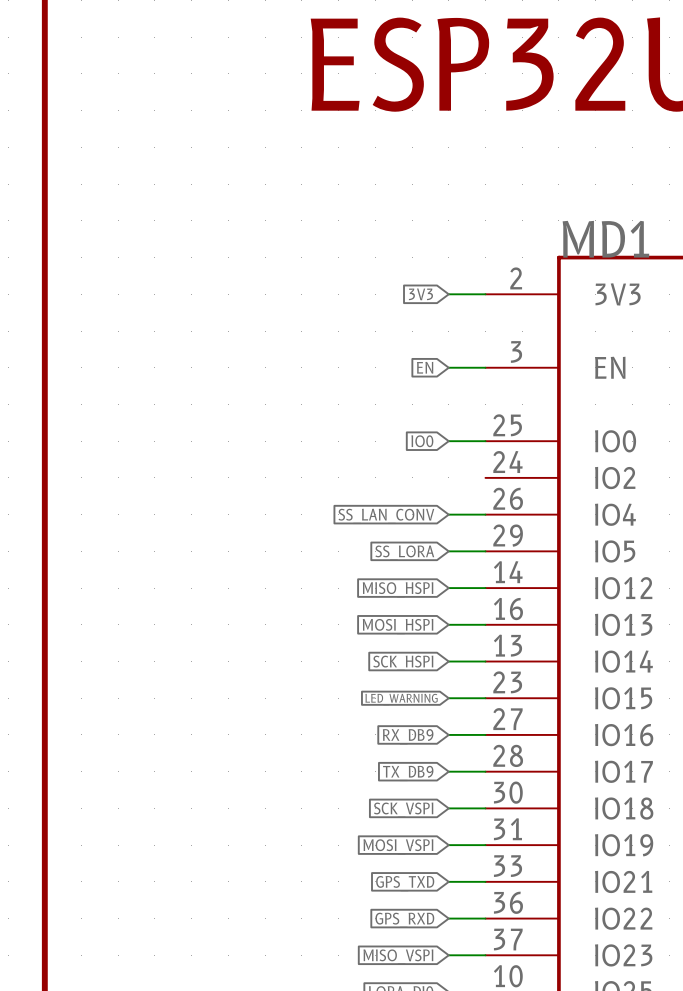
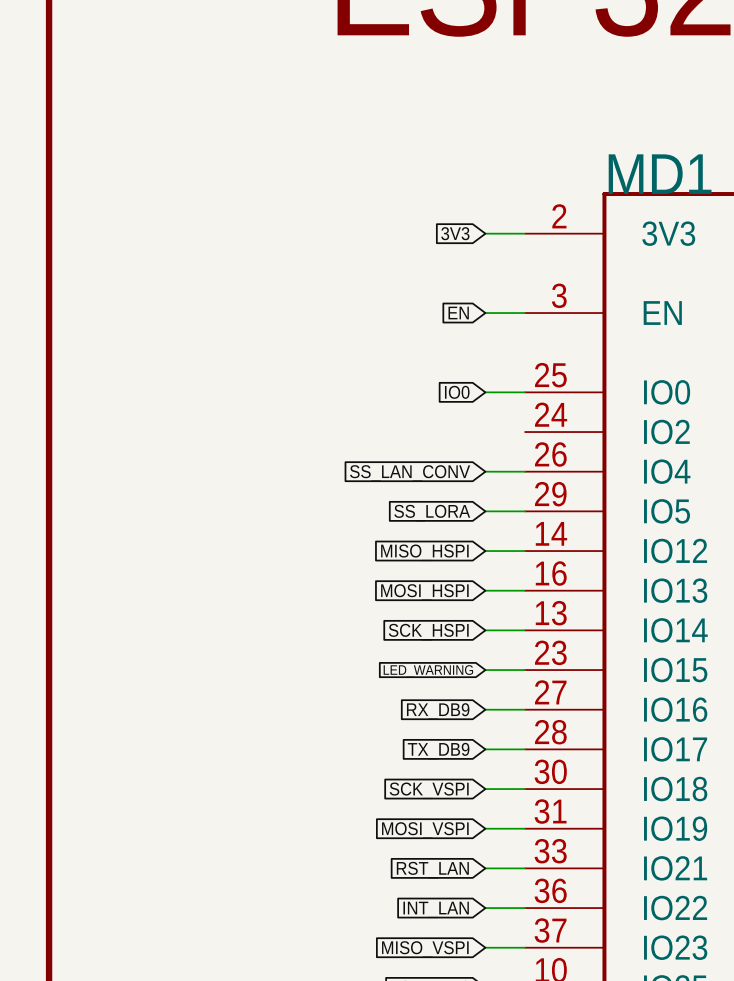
global label: GPS_TXD (405, 883) -> RST_LAN (432, 870)
global label: GPS_RXD (404, 920) -> INT_LAN (436, 909)

